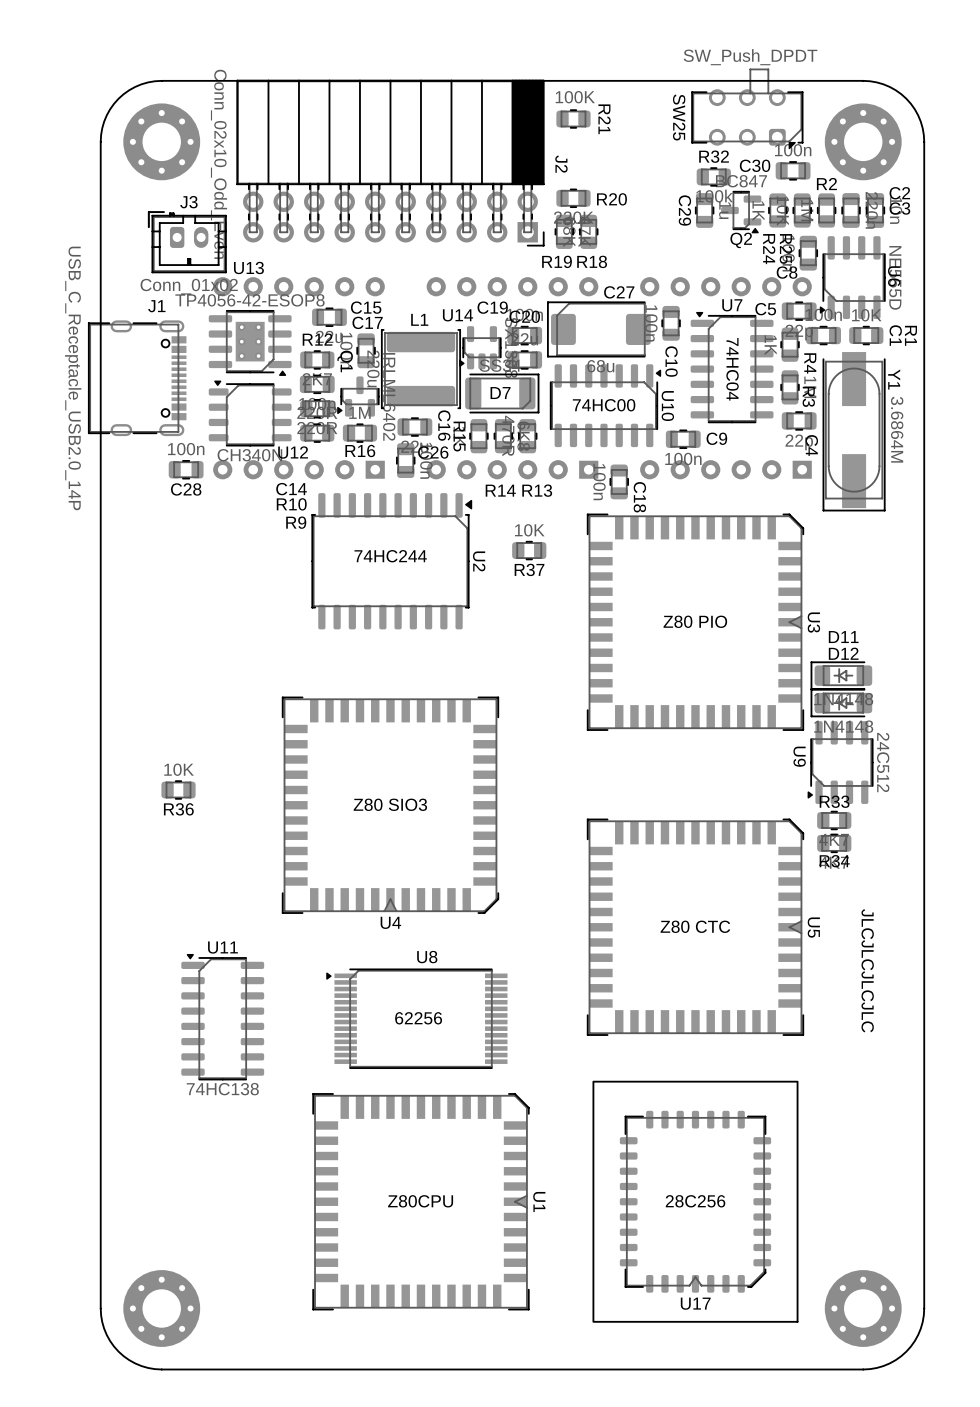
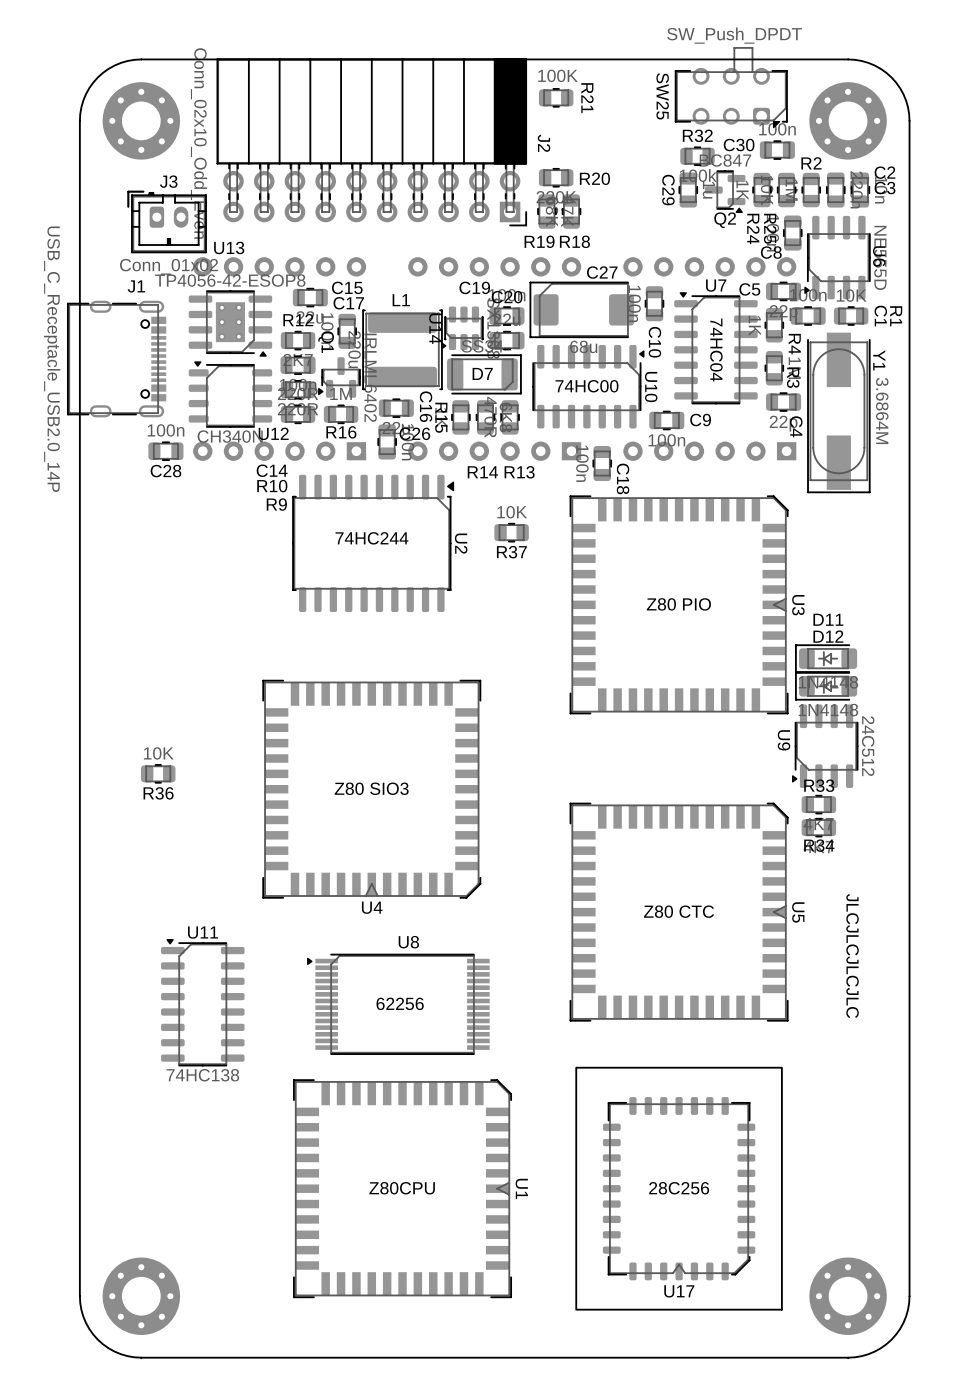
U14 name rotation: 0° (457, 315) -> 90° clockwise (435, 328)
U14 footprint: [459, 326, 502, 370] -> [440, 306, 484, 351]

